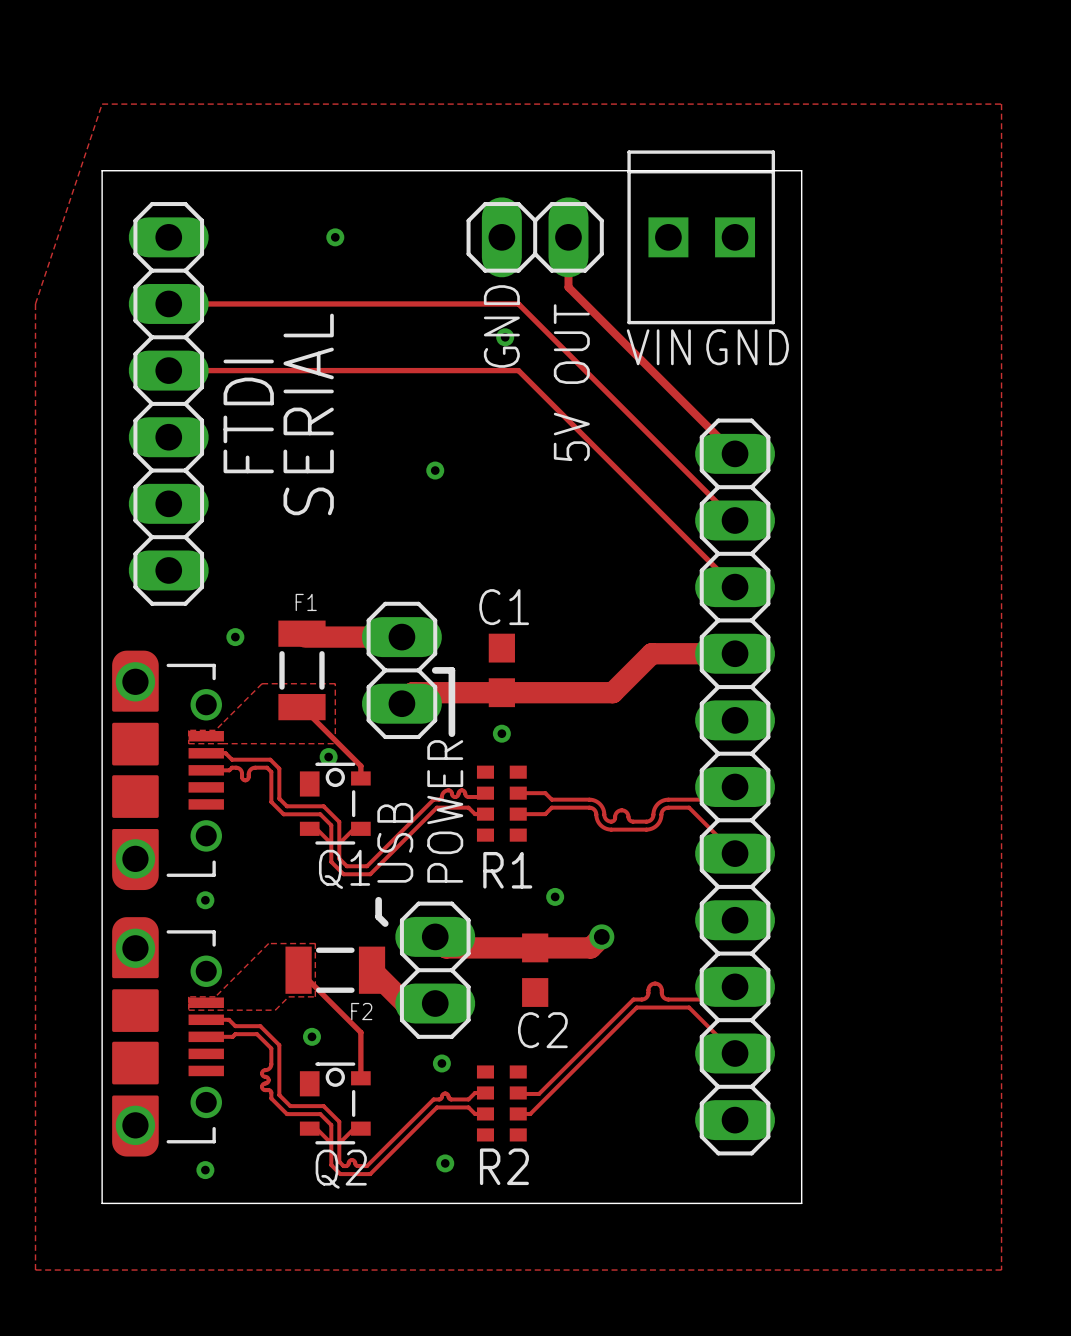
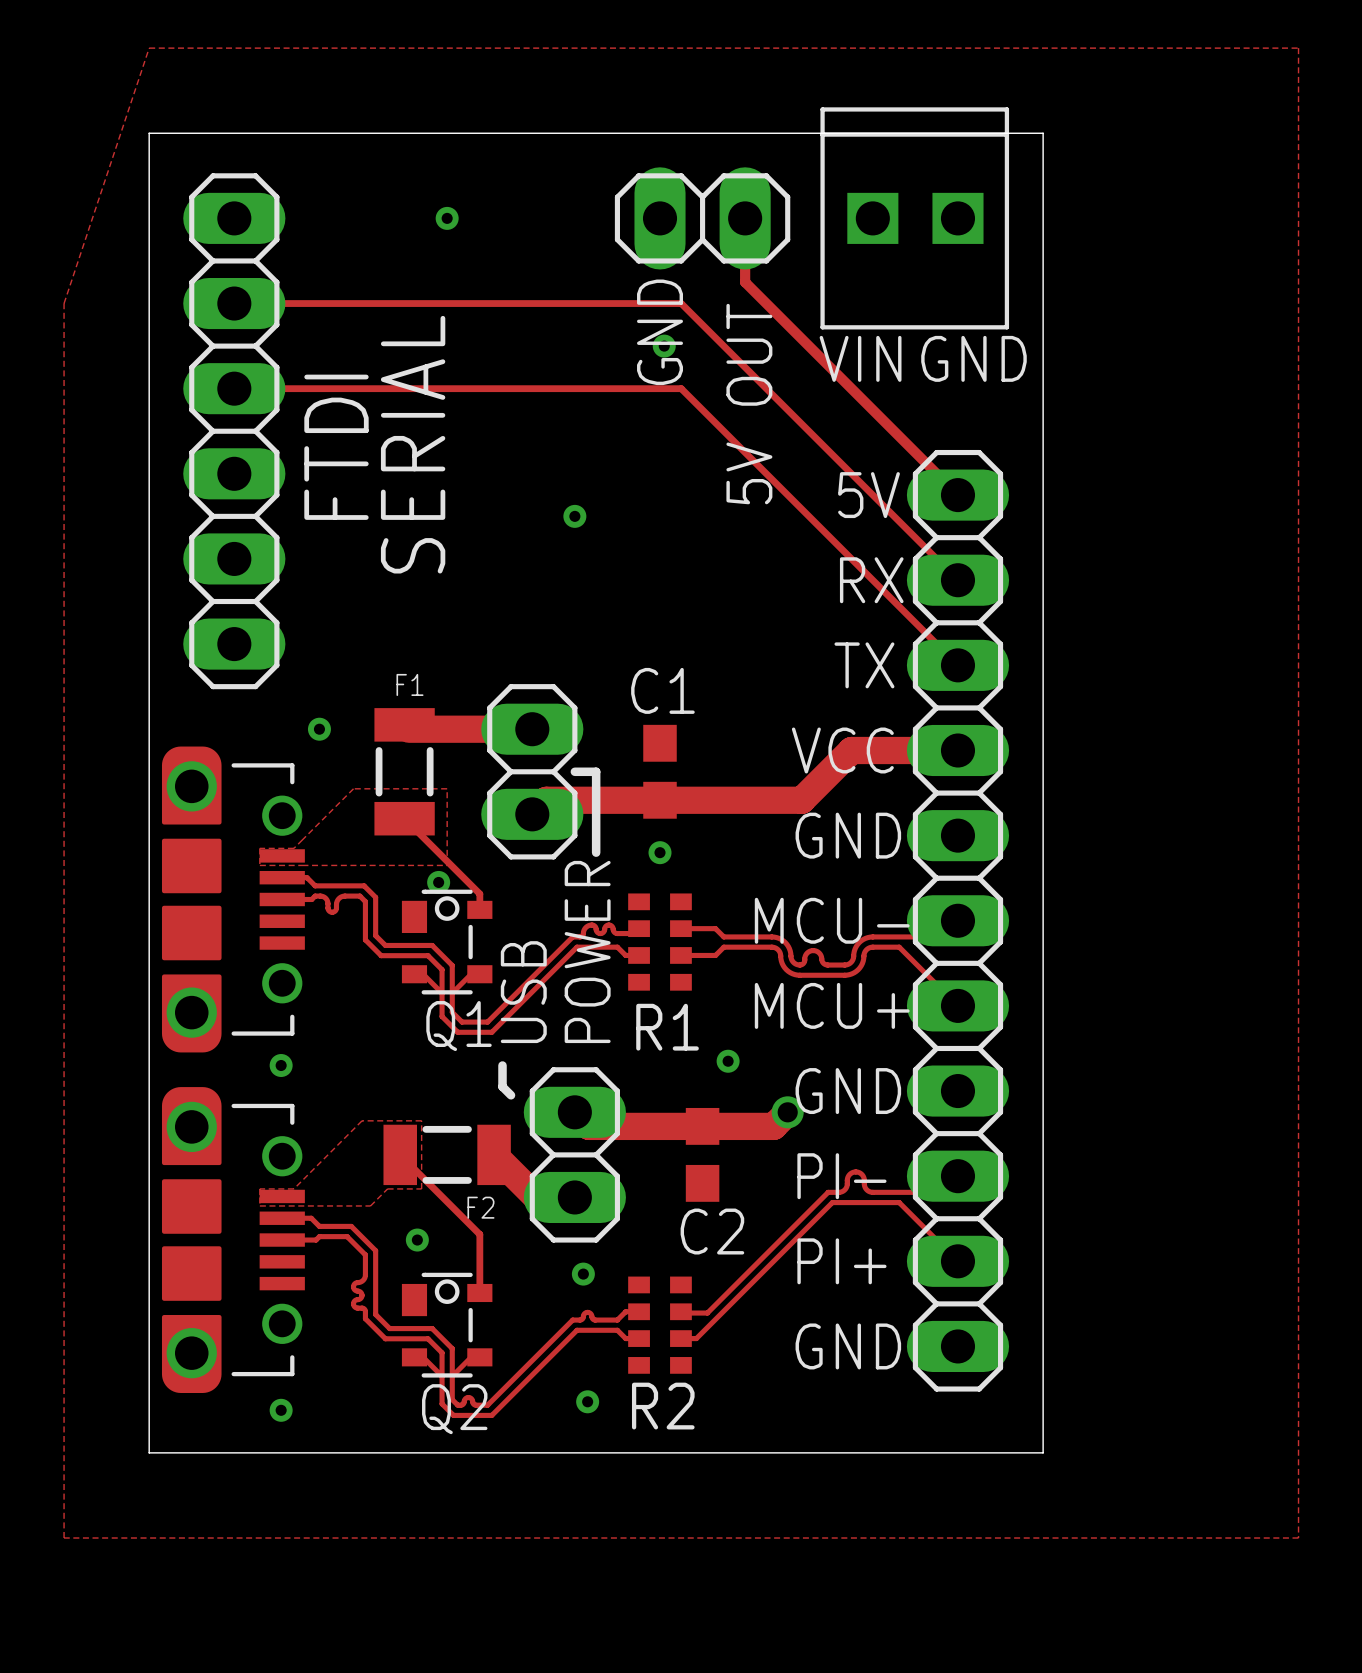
text: none -> 5V (869, 495)
text: none -> RX (871, 580)
text: none -> TX (864, 665)
text: none -> VCC (842, 750)
text: none -> GND (848, 835)
text: none -> MCU- (832, 920)
text: none -> MCU+ (832, 1005)
text: none -> GND (848, 1091)
text: none -> PI- (841, 1176)
text: none -> PI+ (841, 1261)
text: none -> GND (848, 1346)

